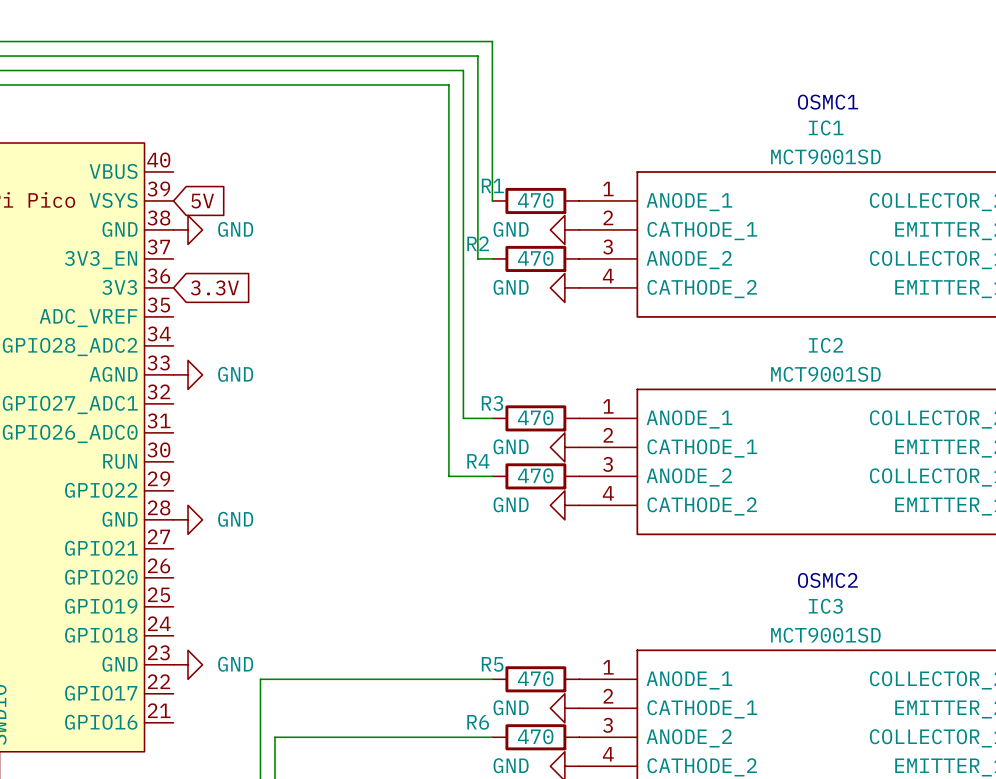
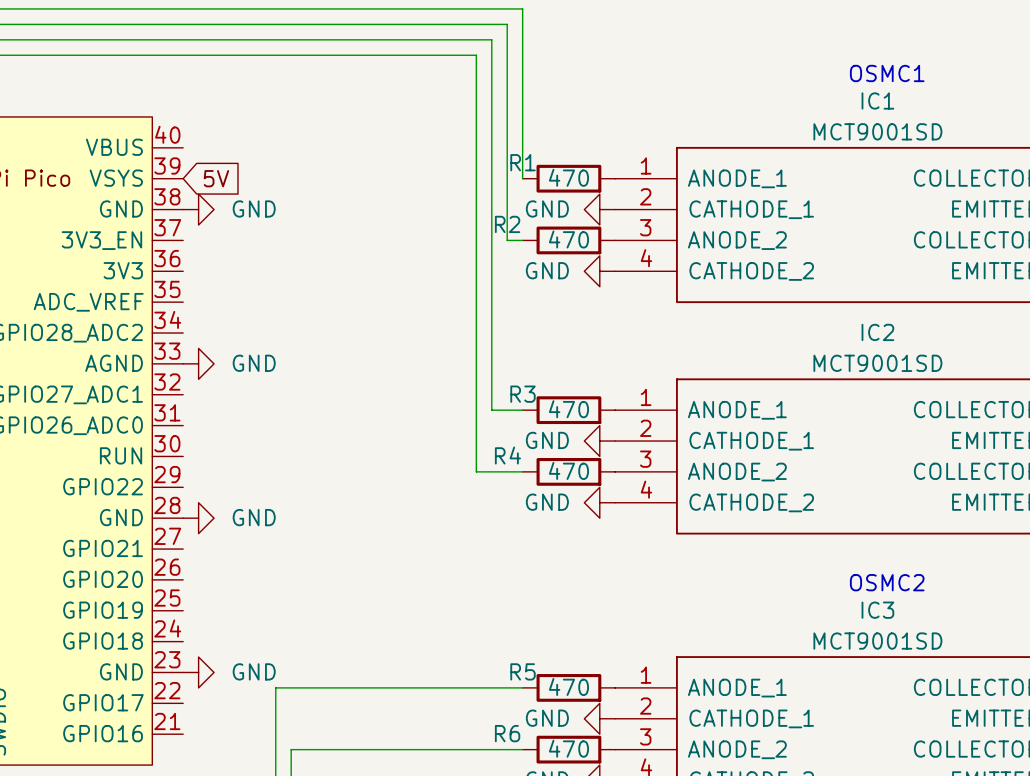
global label: 3.3V (214, 287) -> none

